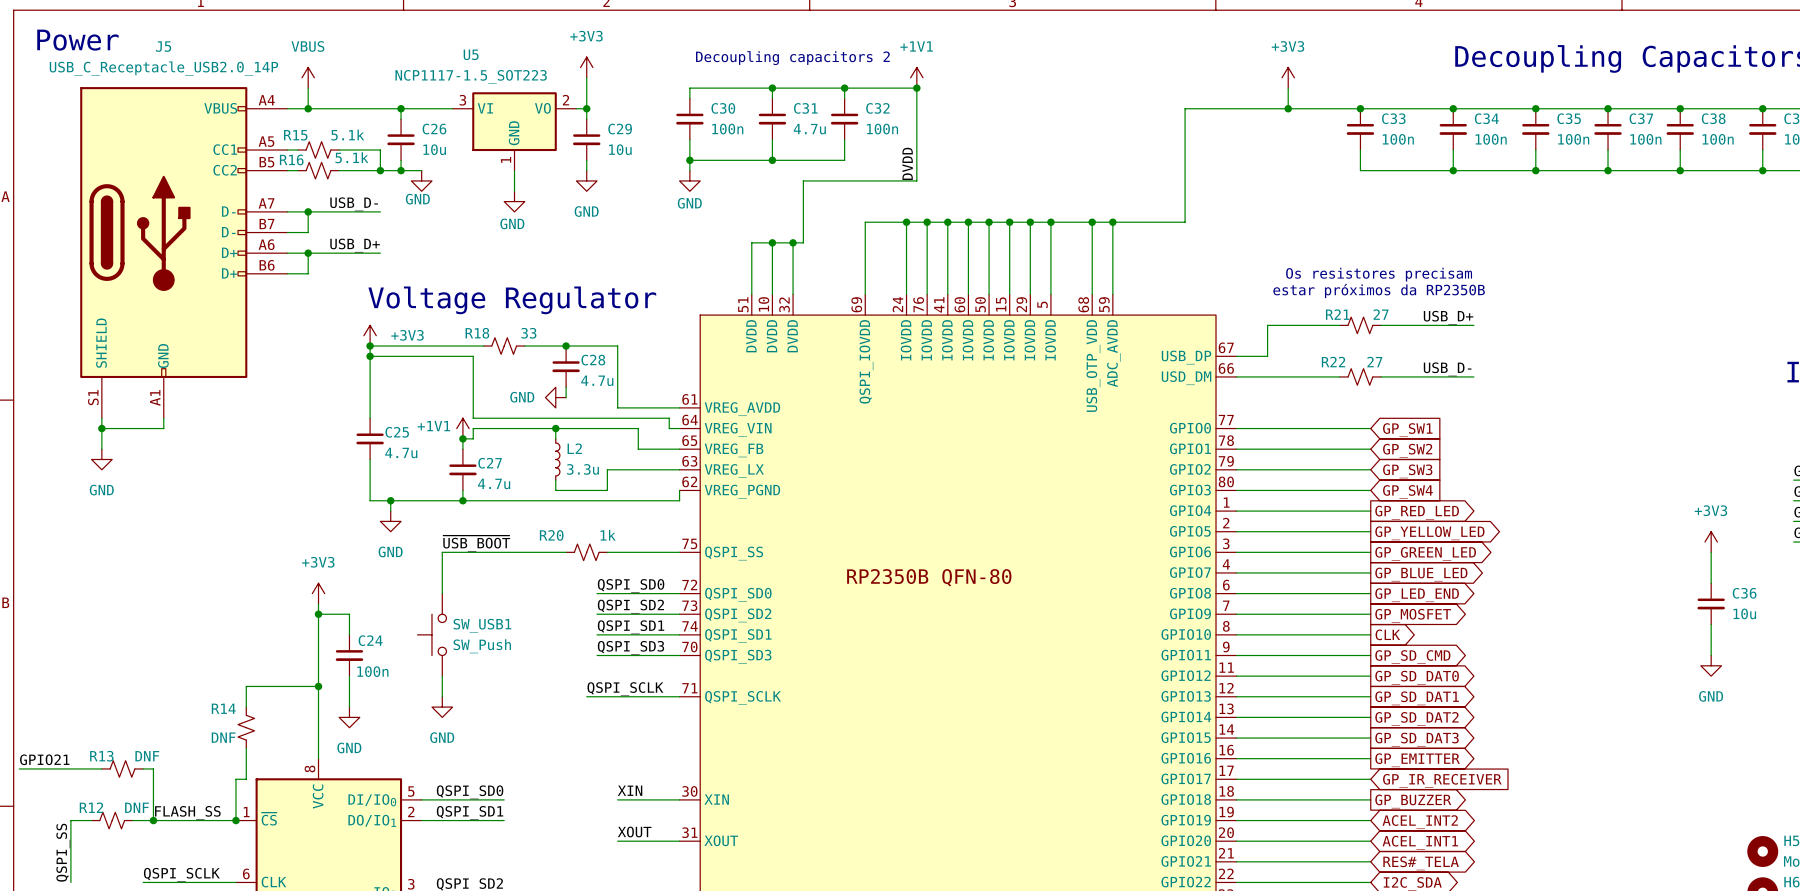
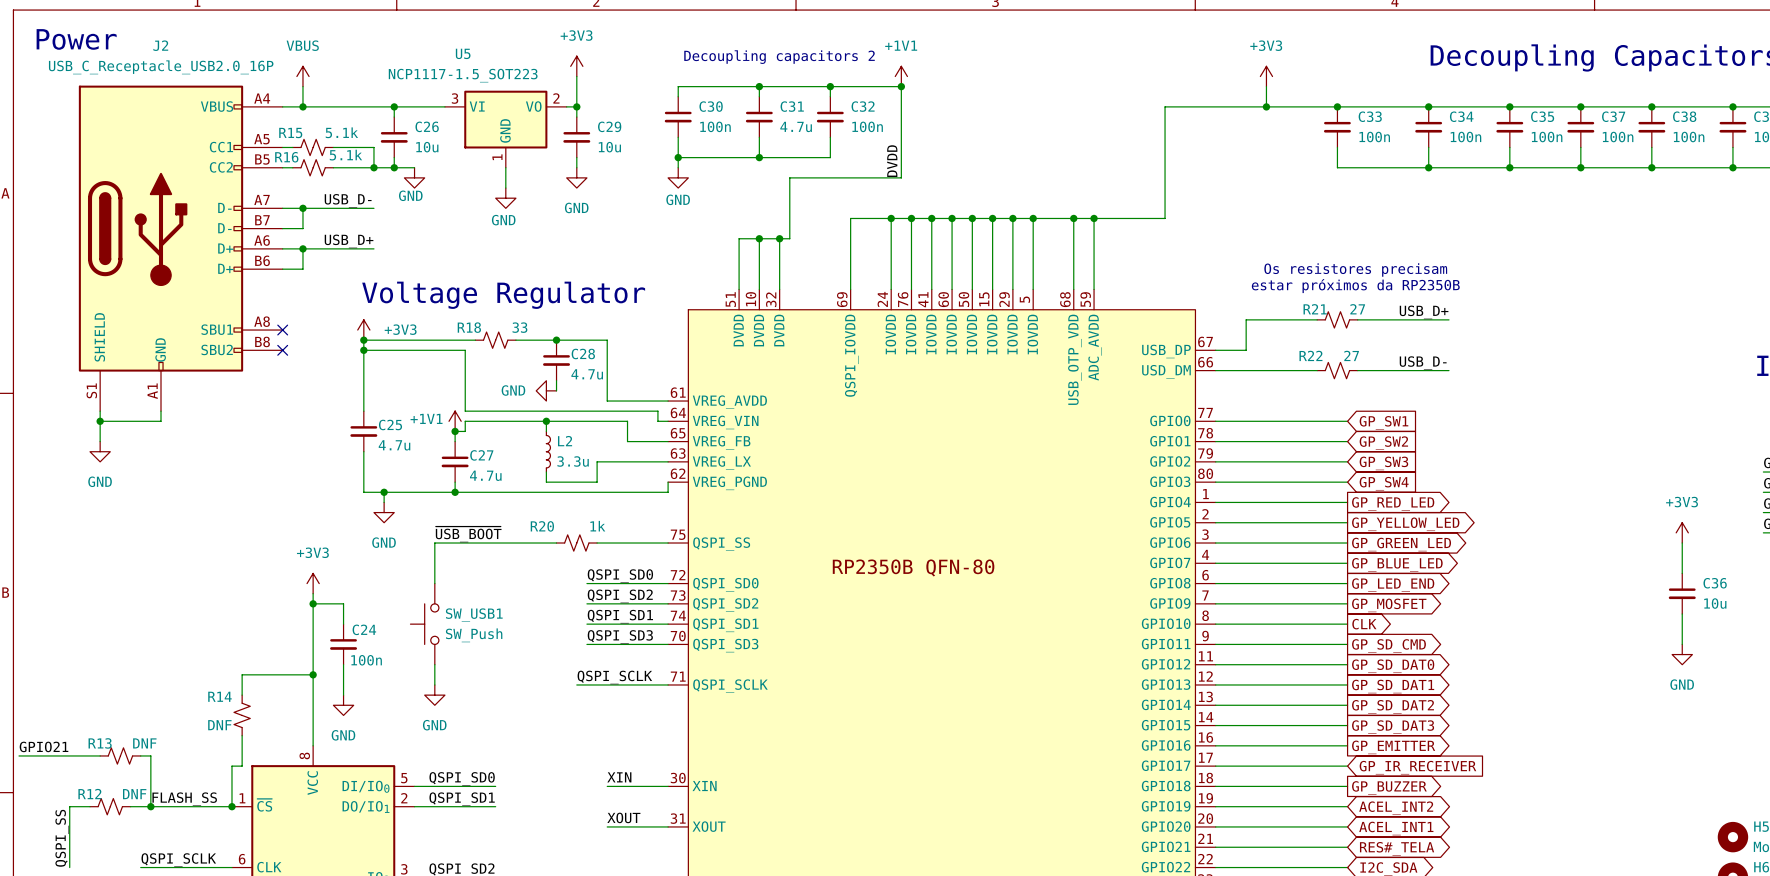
J5: USB_C_Receptacle_USB2.0_14P (183, 252) -> none
J2: none -> USB_C_Receptacle_USB2.0_16P (180, 248)
no-connect mark: none -> (282, 330)
no-connect mark: none -> (282, 350)

